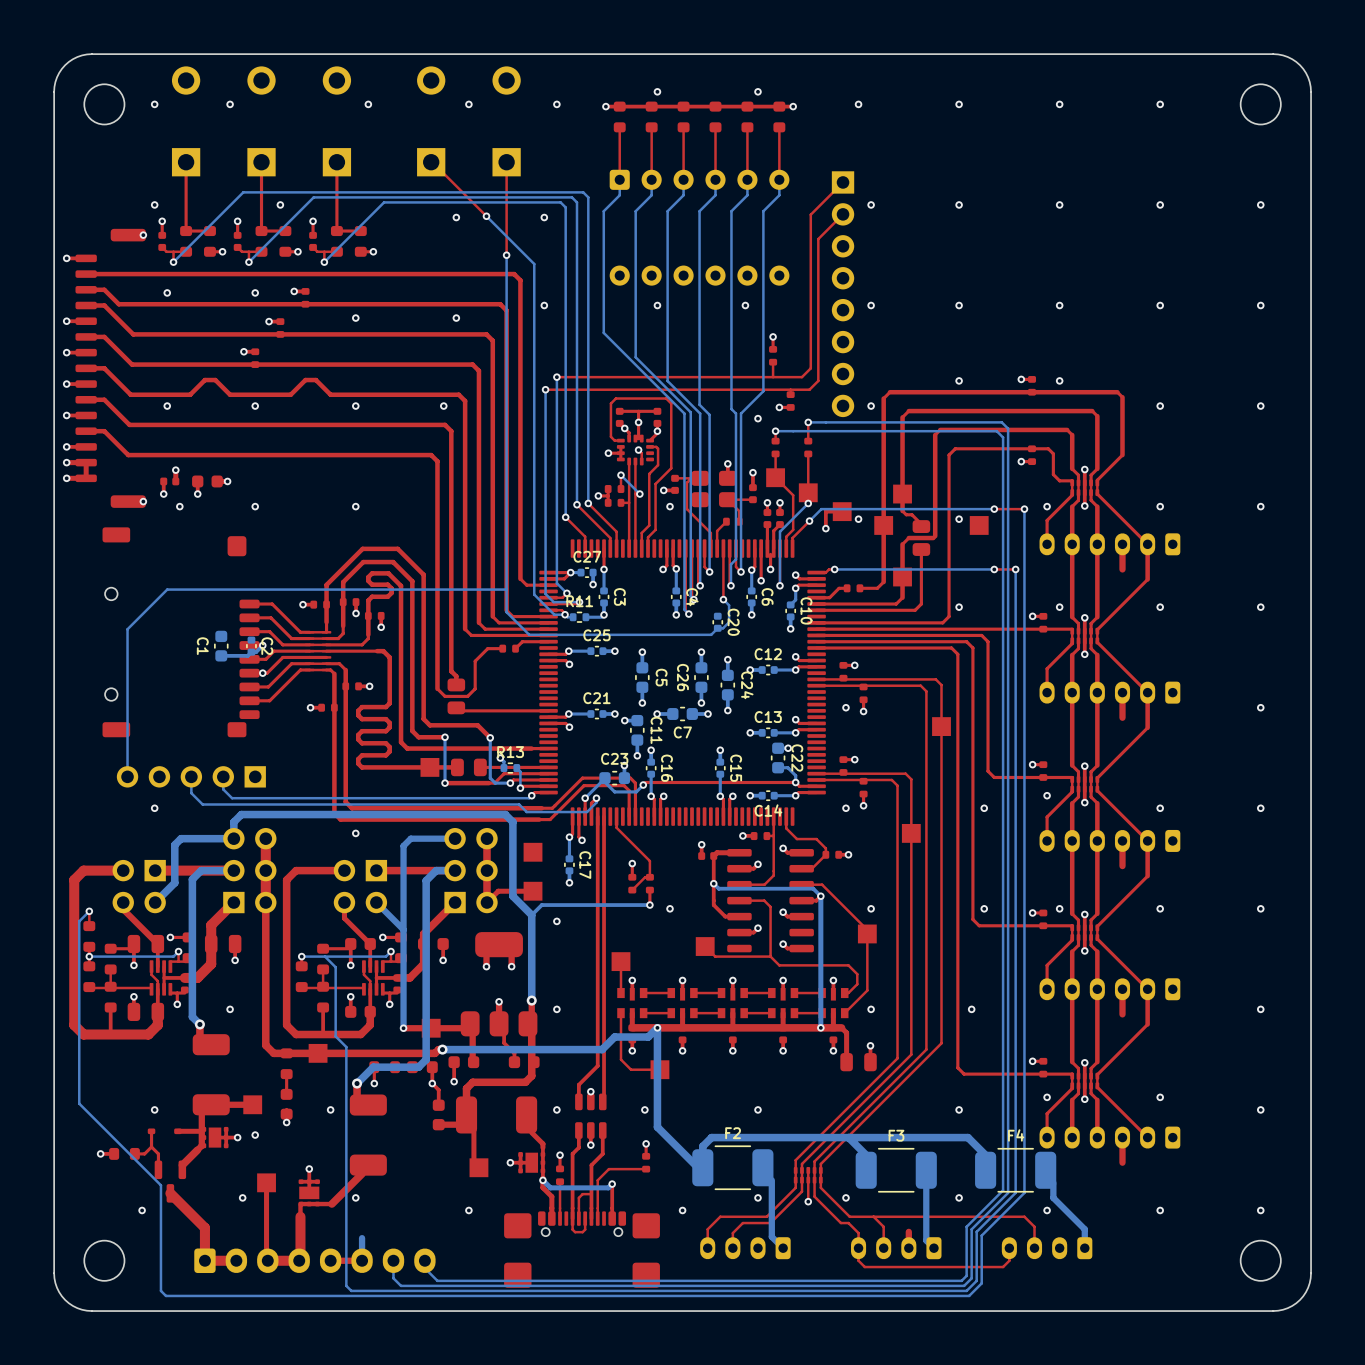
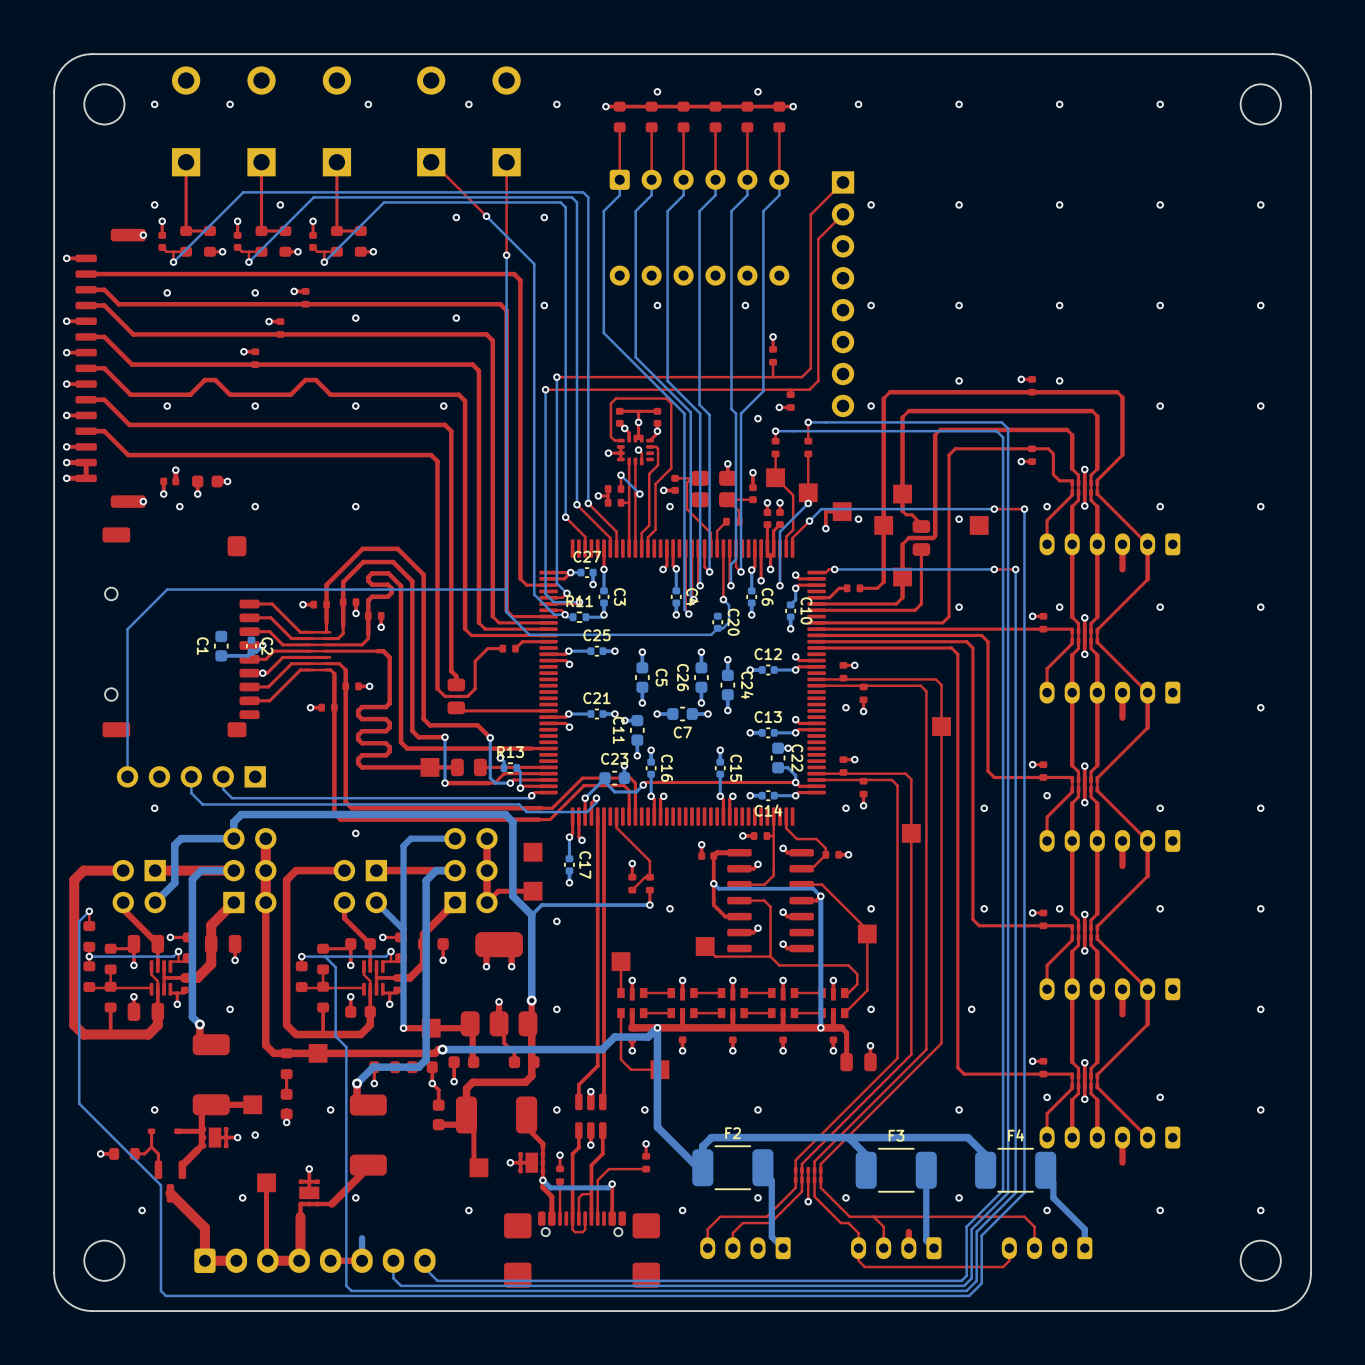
C11 name position: C11 (656, 730) -> C11 (618, 730)

